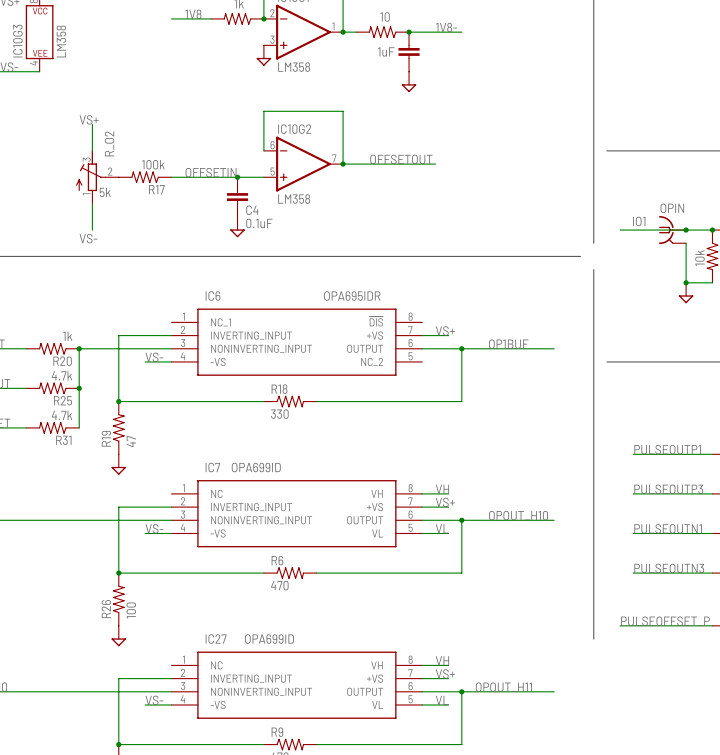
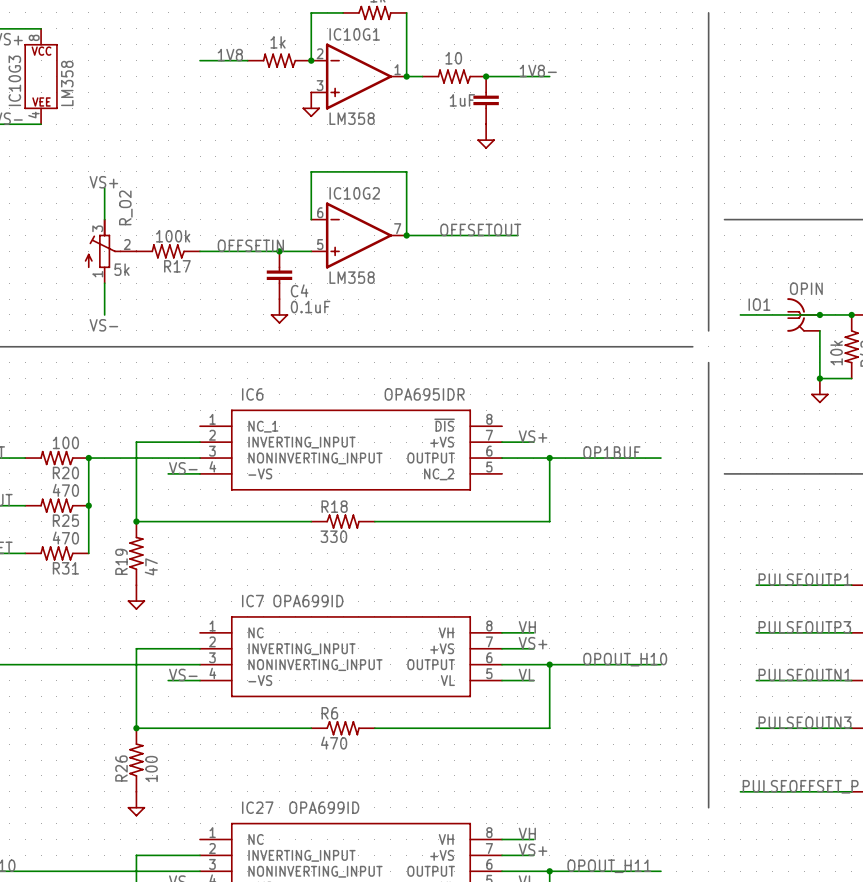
R20 value: 1k (67, 336) -> 100 (65, 442)
R25 value: 4.7k (62, 375) -> 470 (65, 490)
R31 value: 4.7k (62, 415) -> 470 (65, 538)

